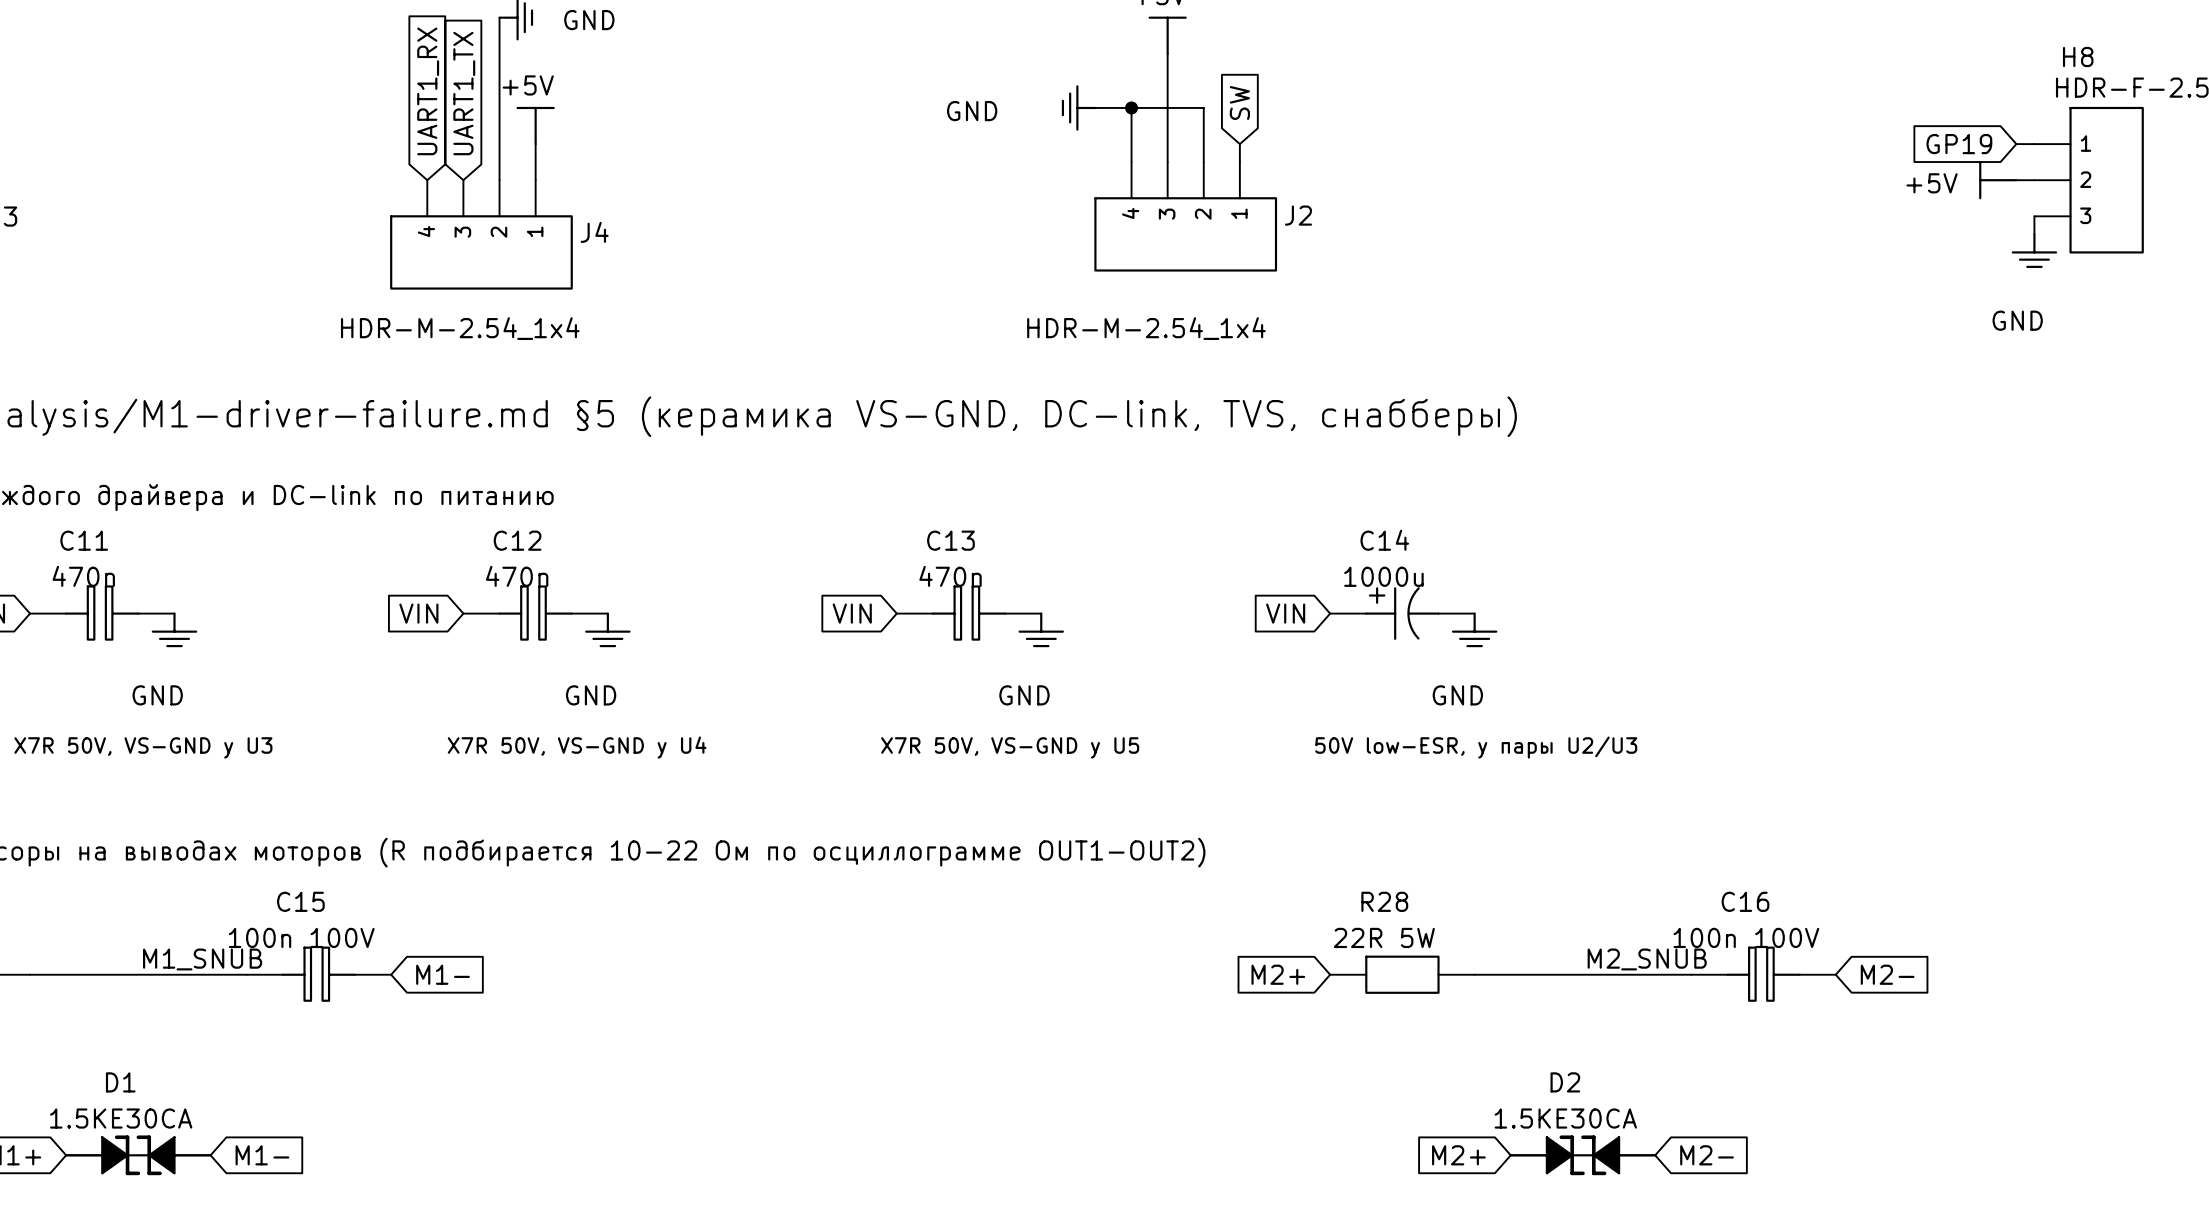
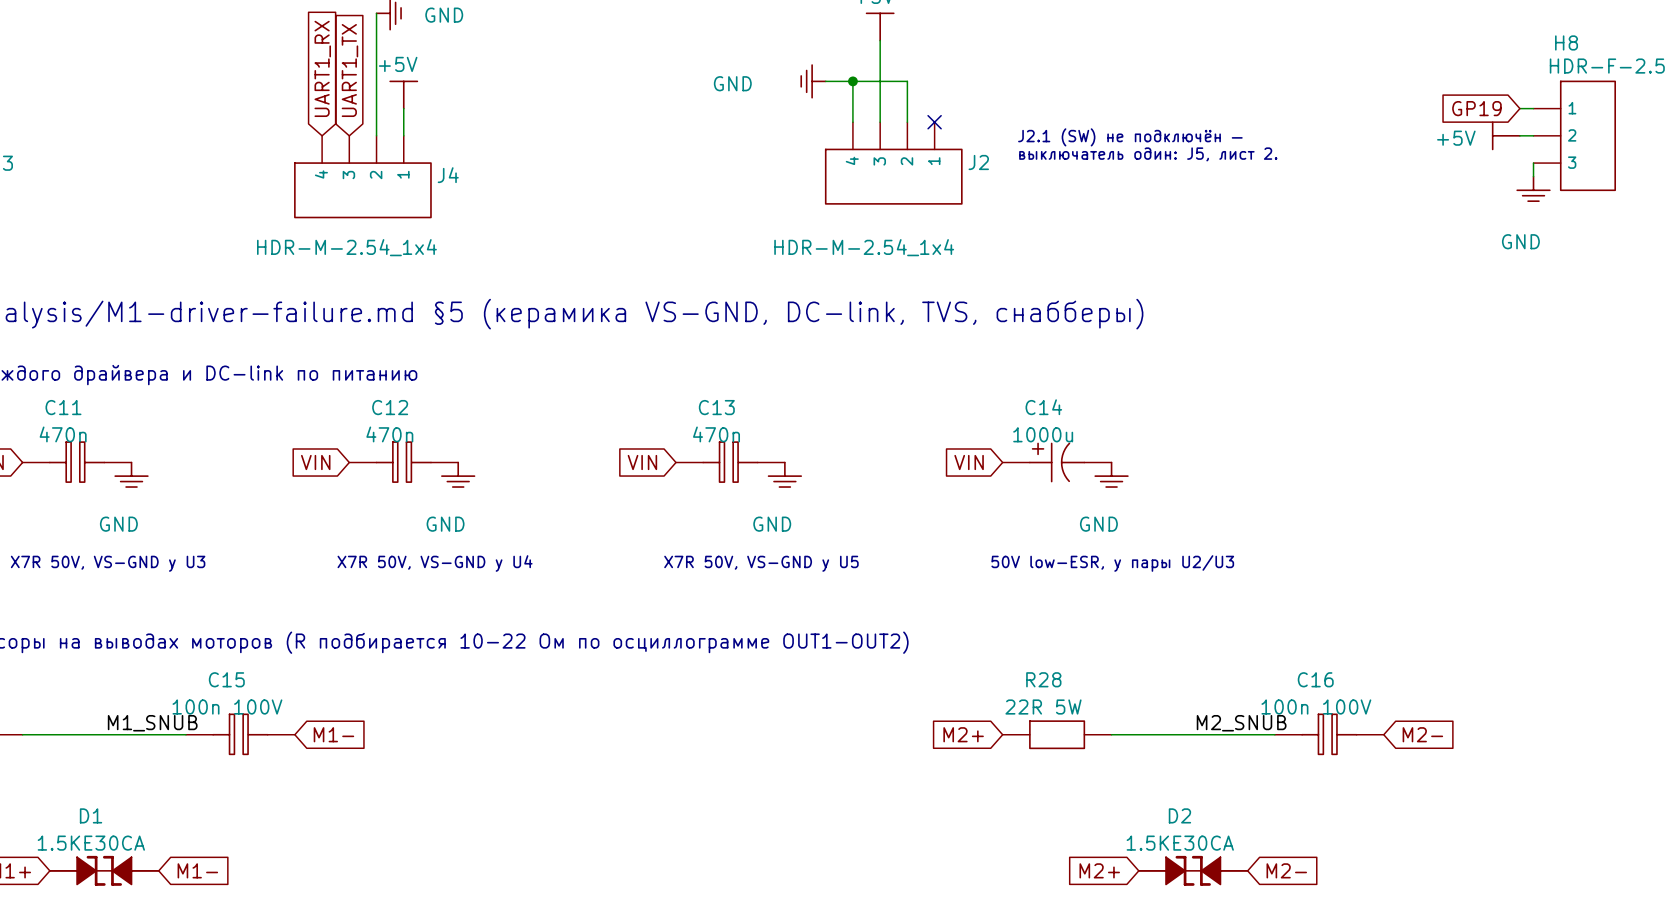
global label: SW (1239, 103) -> none
wire: (1239, 144) (1239, 162) -> none
no-connect mark: none -> (934, 122)
text: none -> J2.1 (SW) не подключён — (1130, 137)
text: none -> выключатель один: J5, лист 2. (1148, 154)

